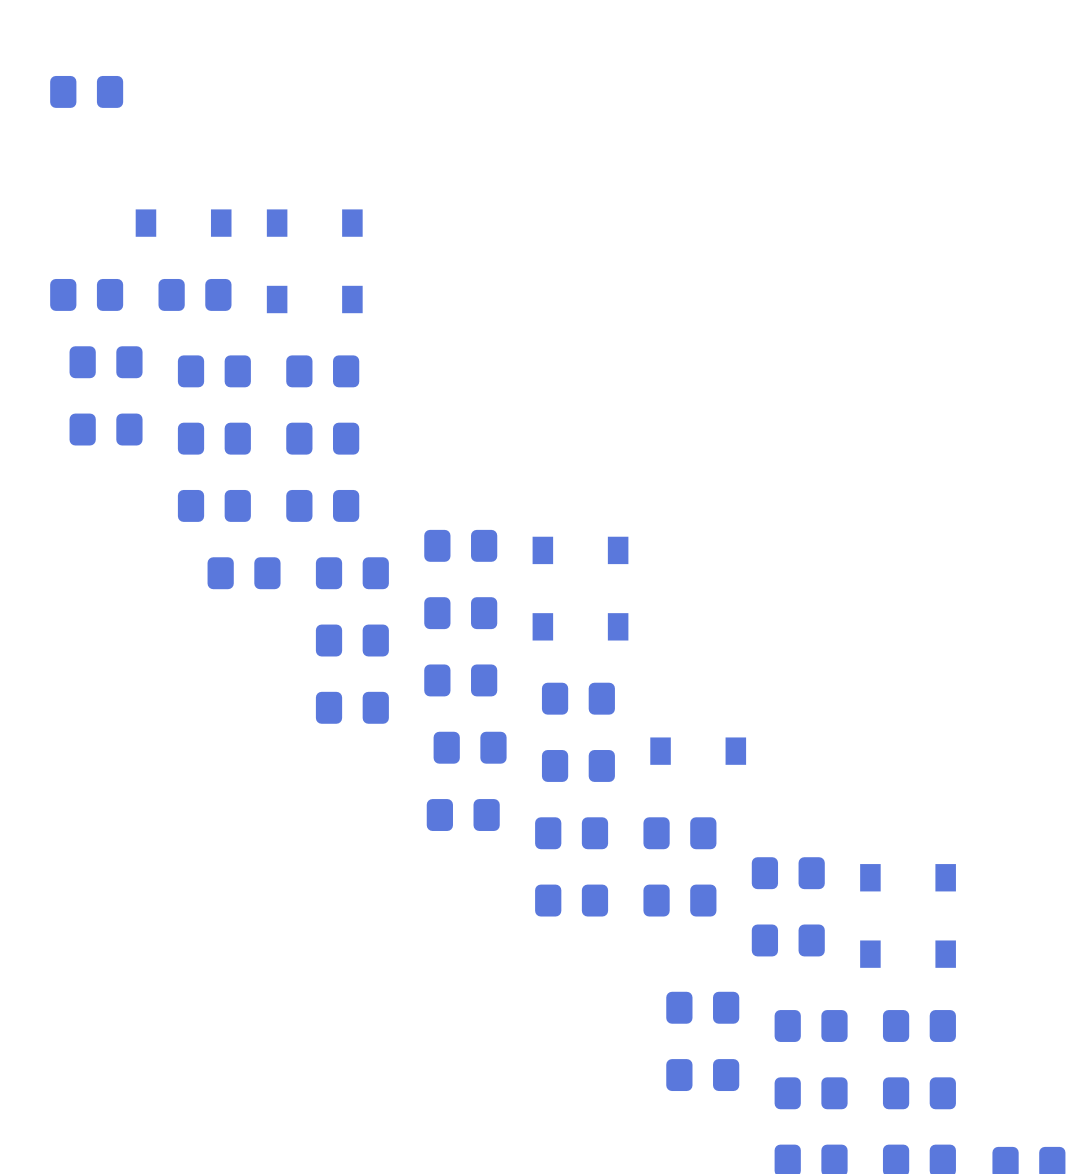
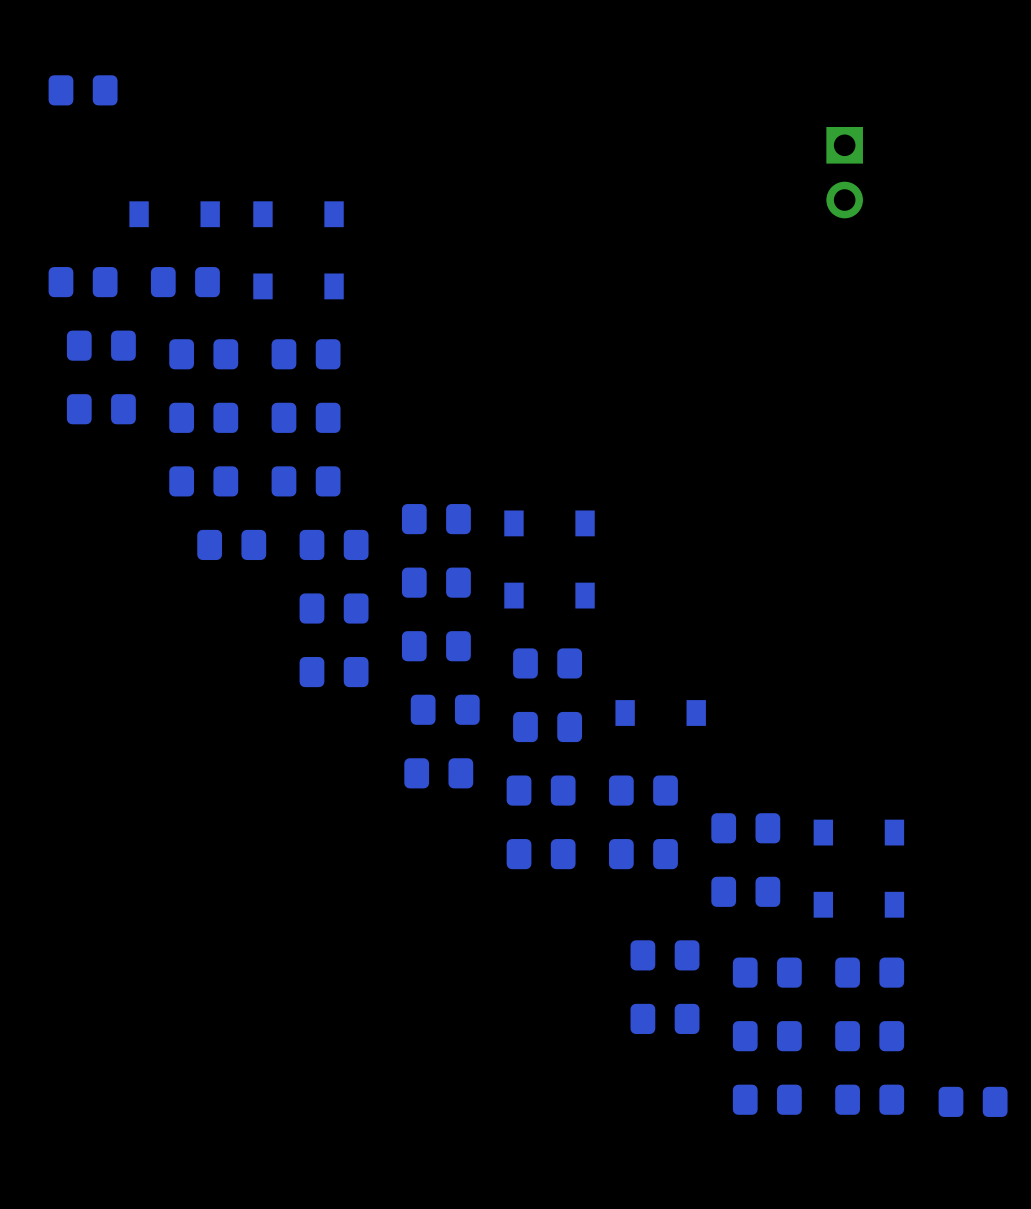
part: none -> (844, 172)

